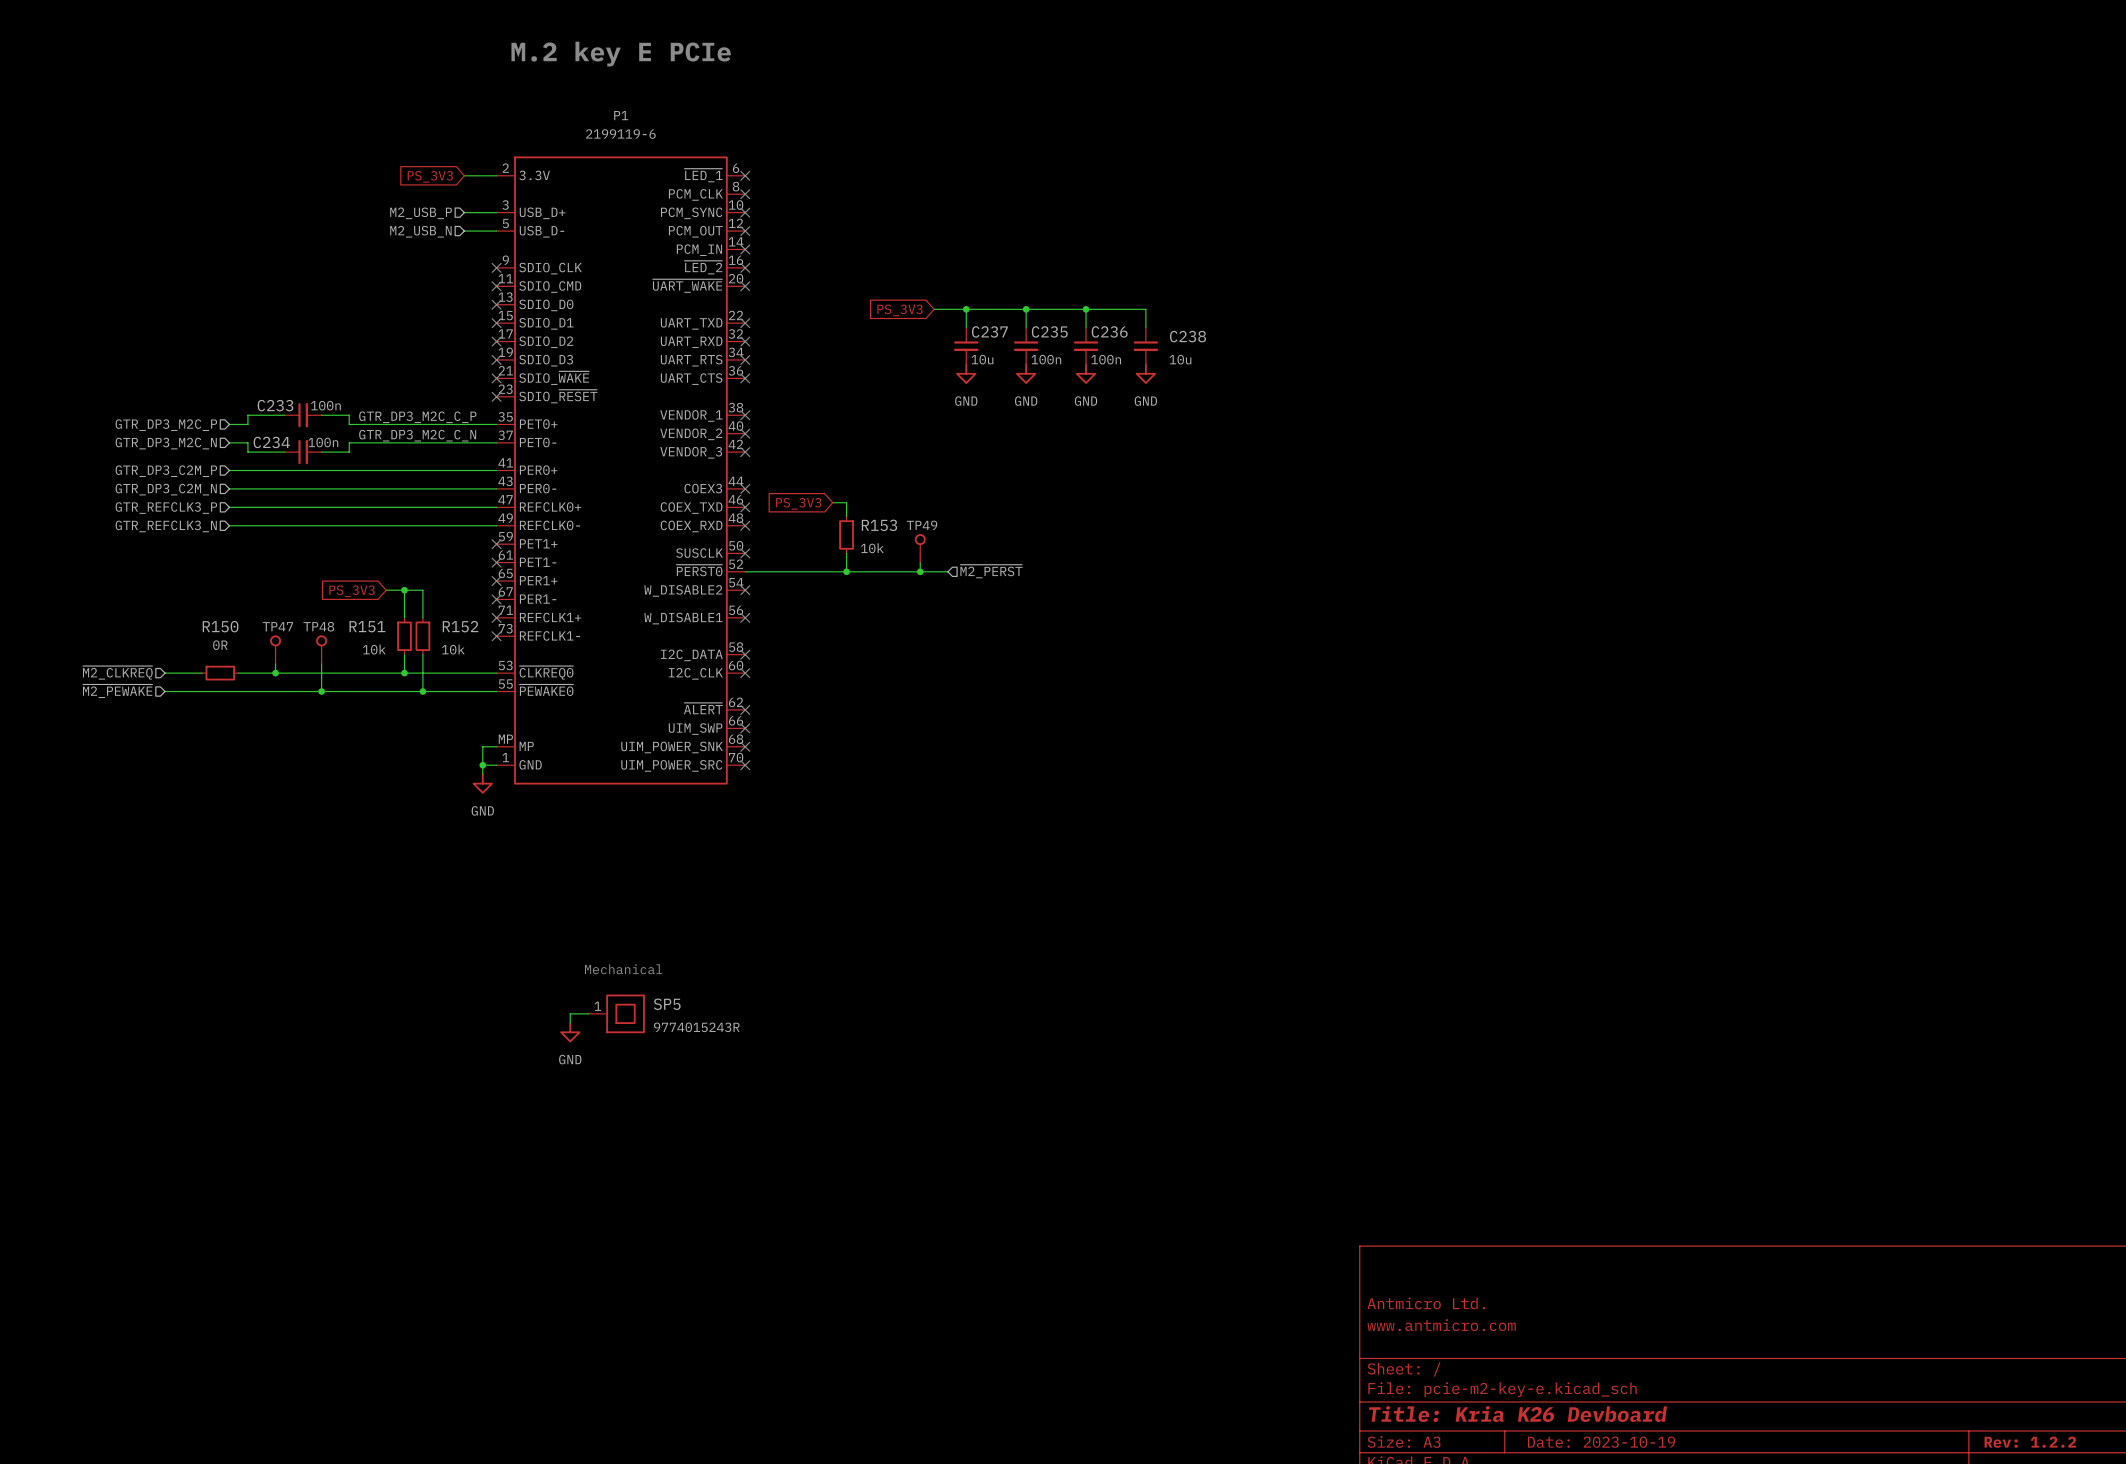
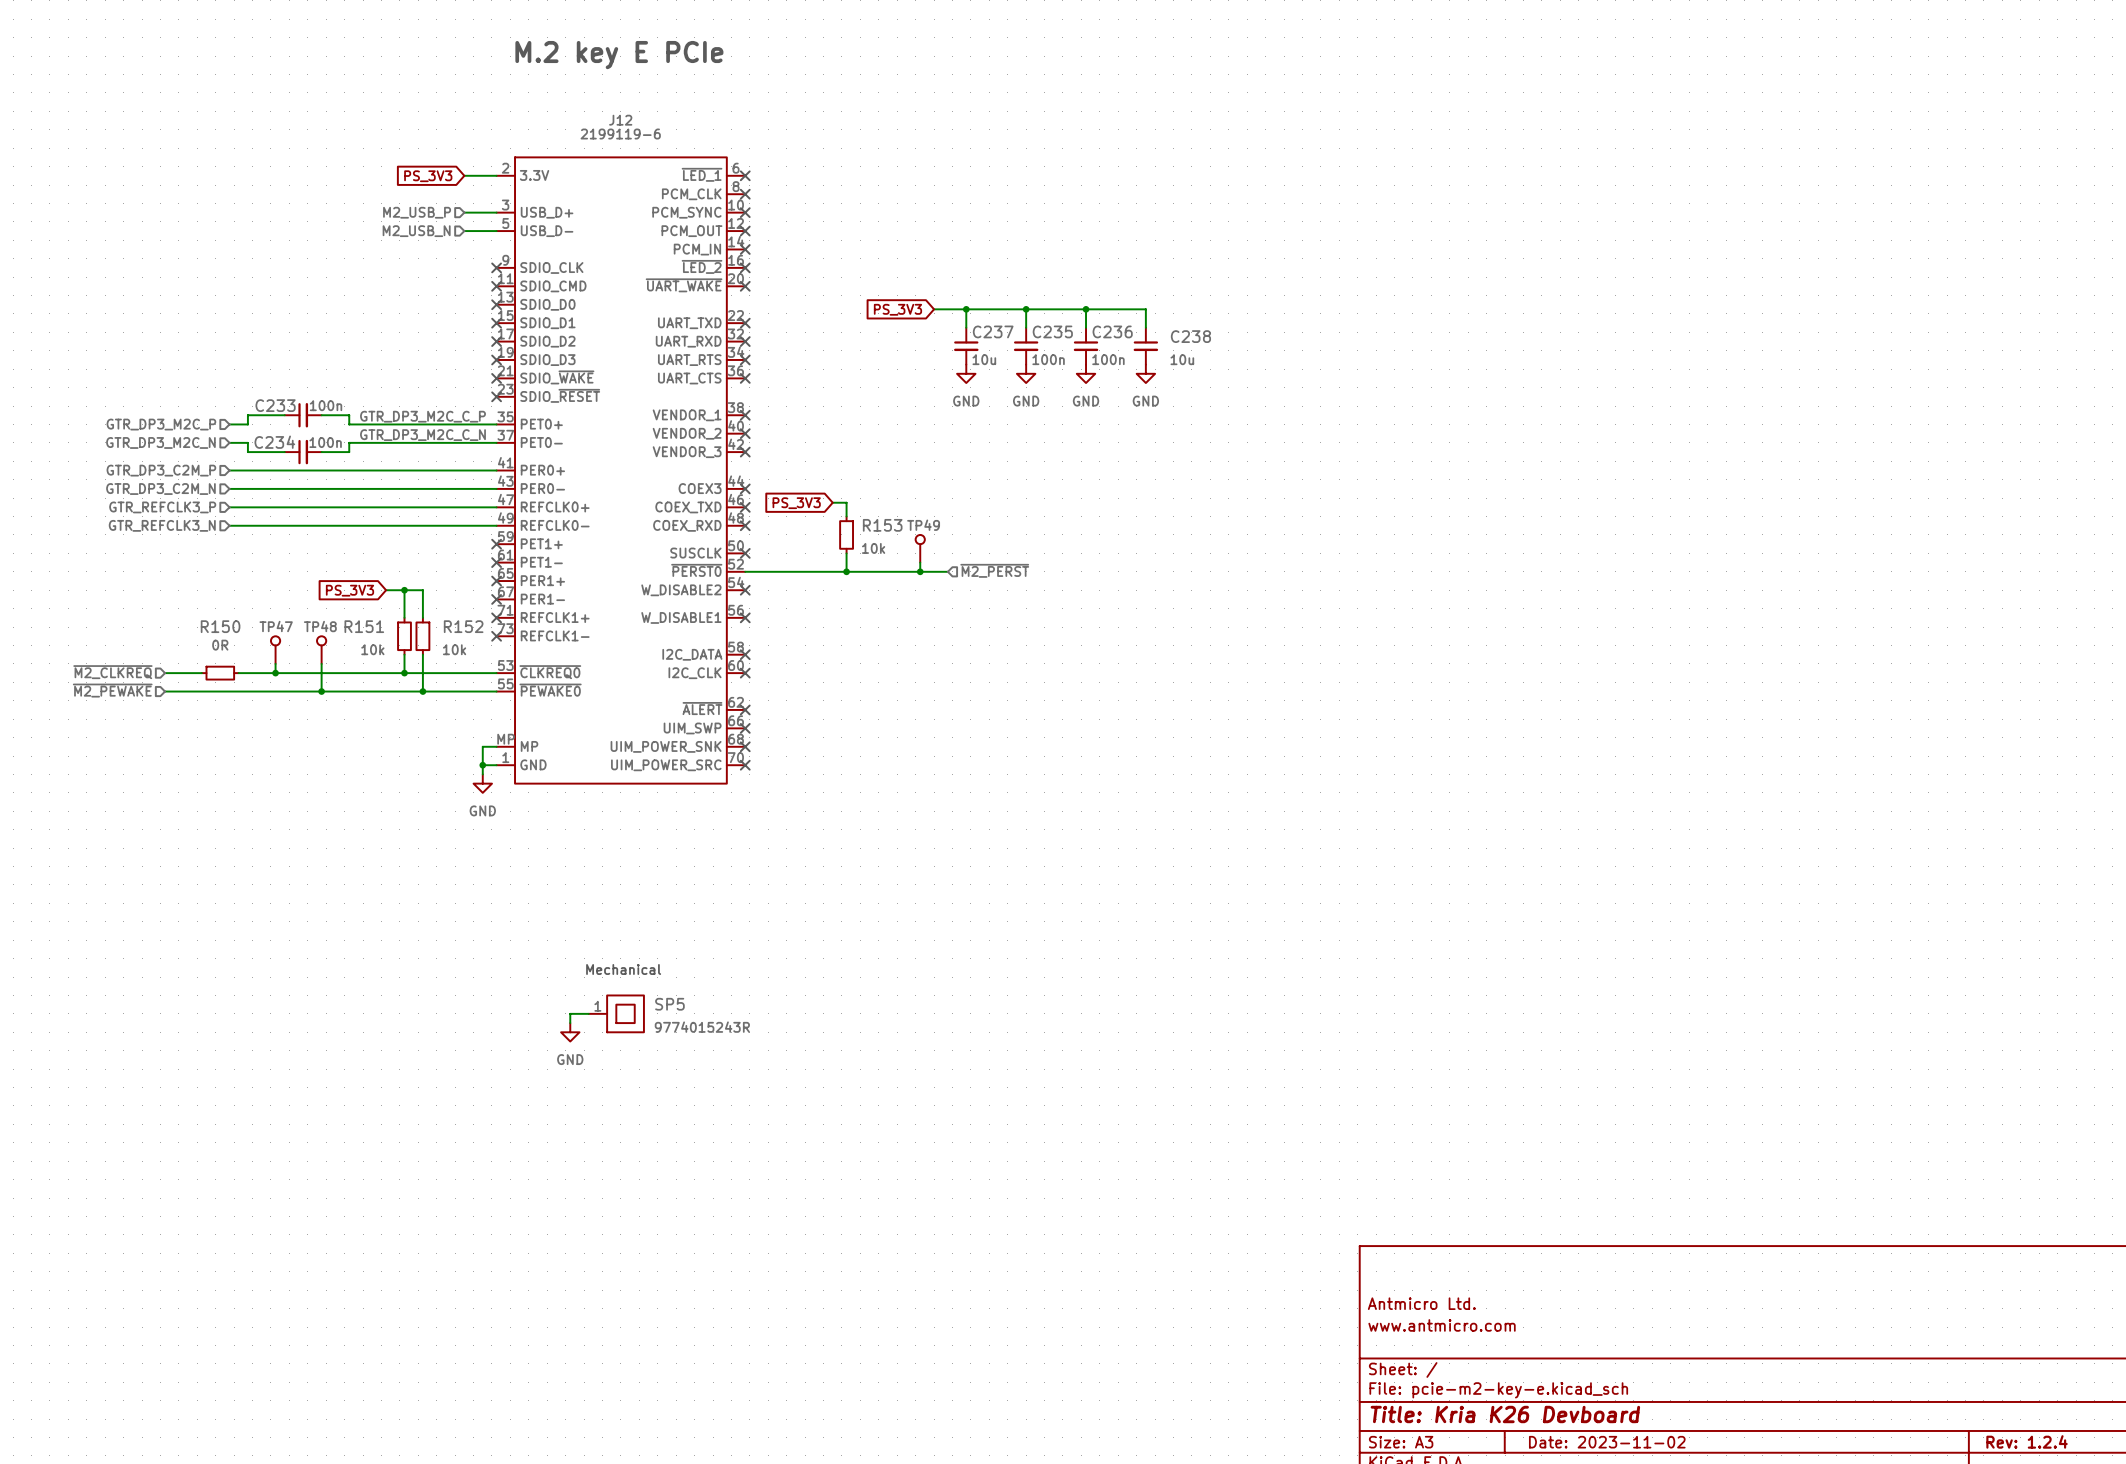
P1 name: P1 (621, 115) -> J12 (620, 120)
title block: Date: 2023-10-19 (1601, 1442) -> Date: 2023-11-02 (1607, 1442)
title block: Rev: 1.2.2 (2030, 1442) -> Rev: 1.2.4 (2027, 1441)

